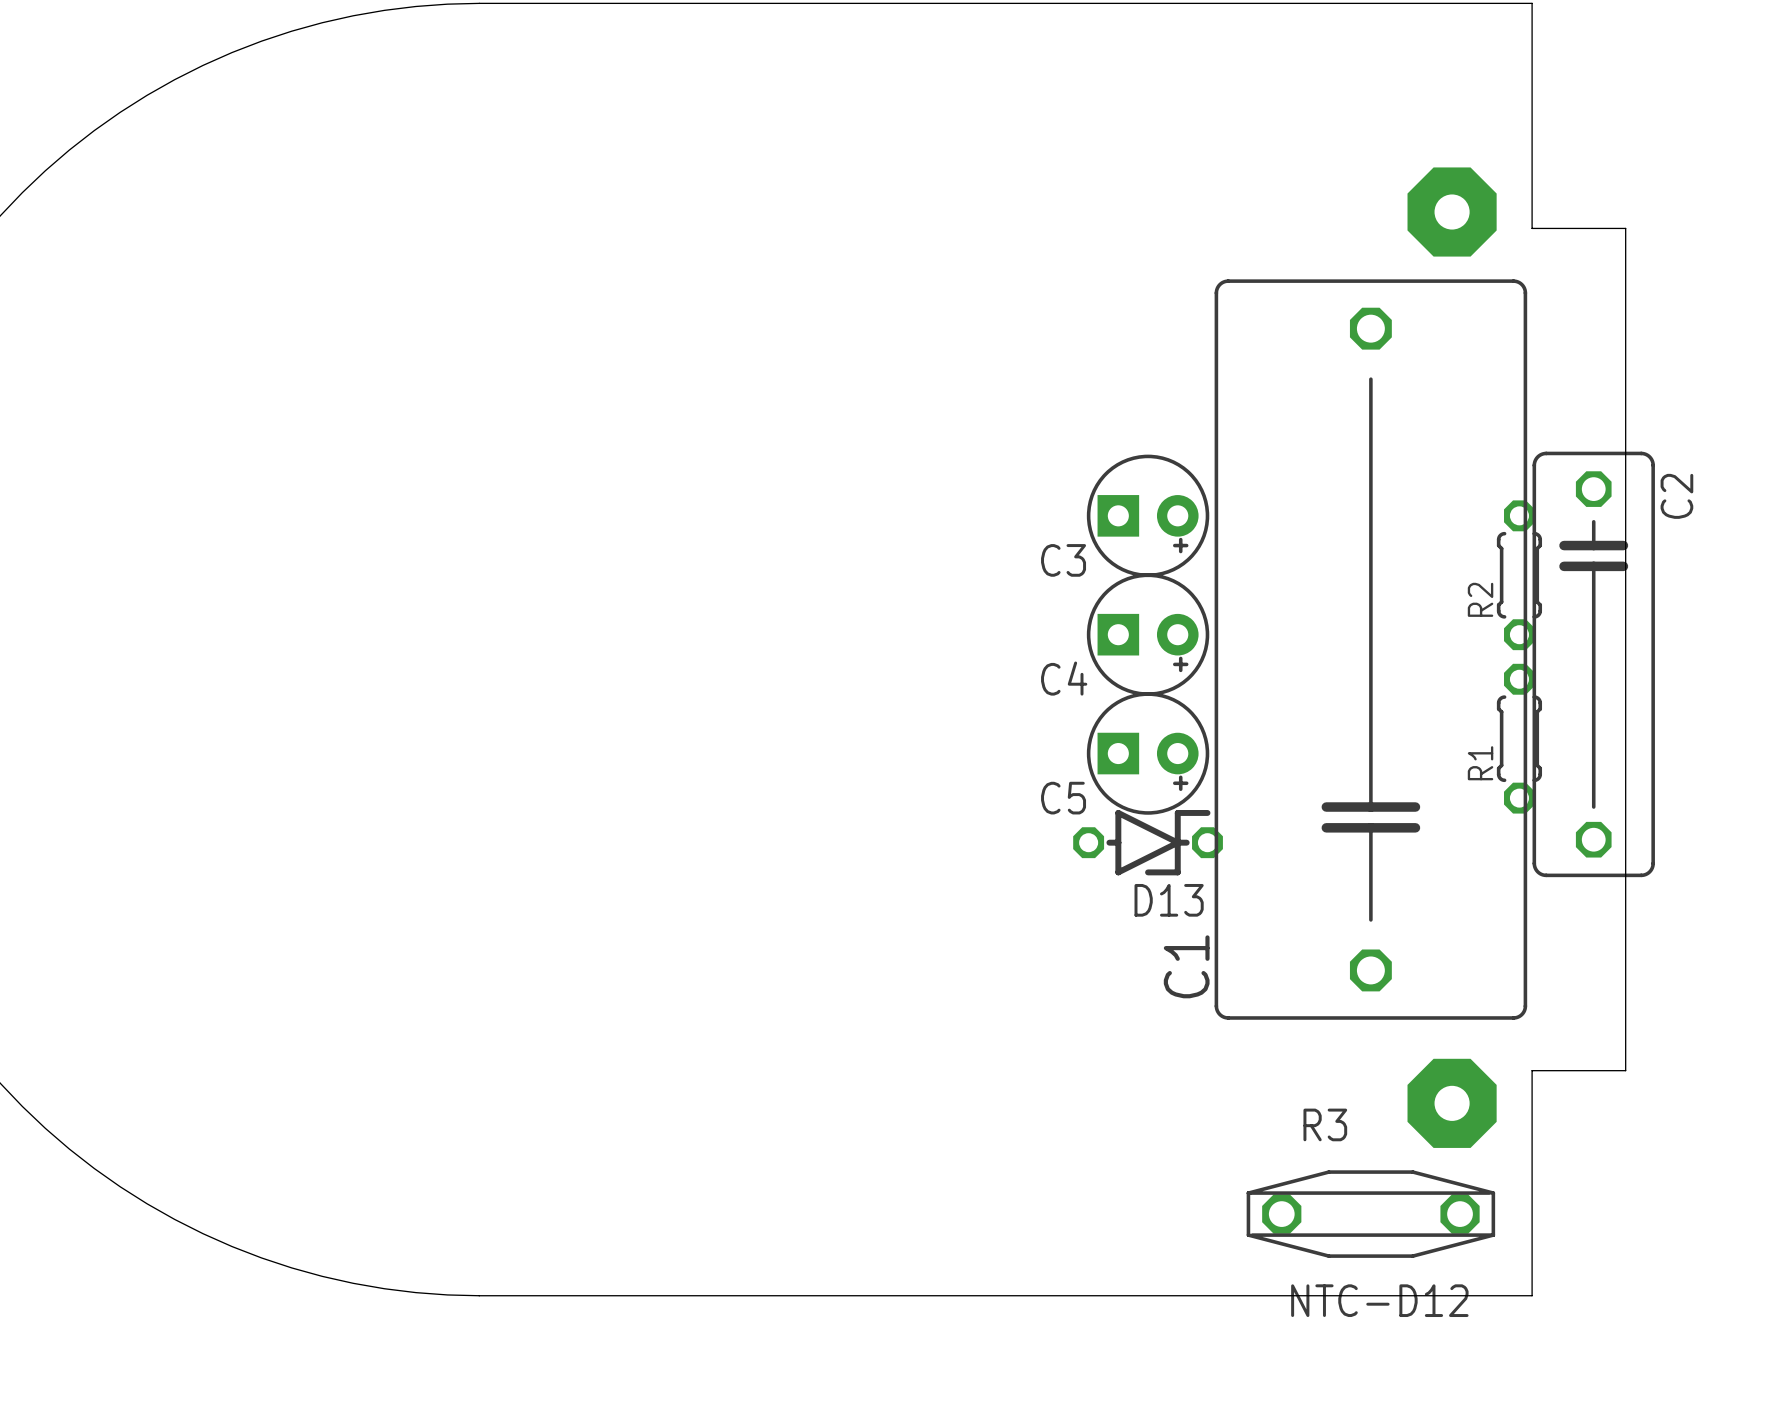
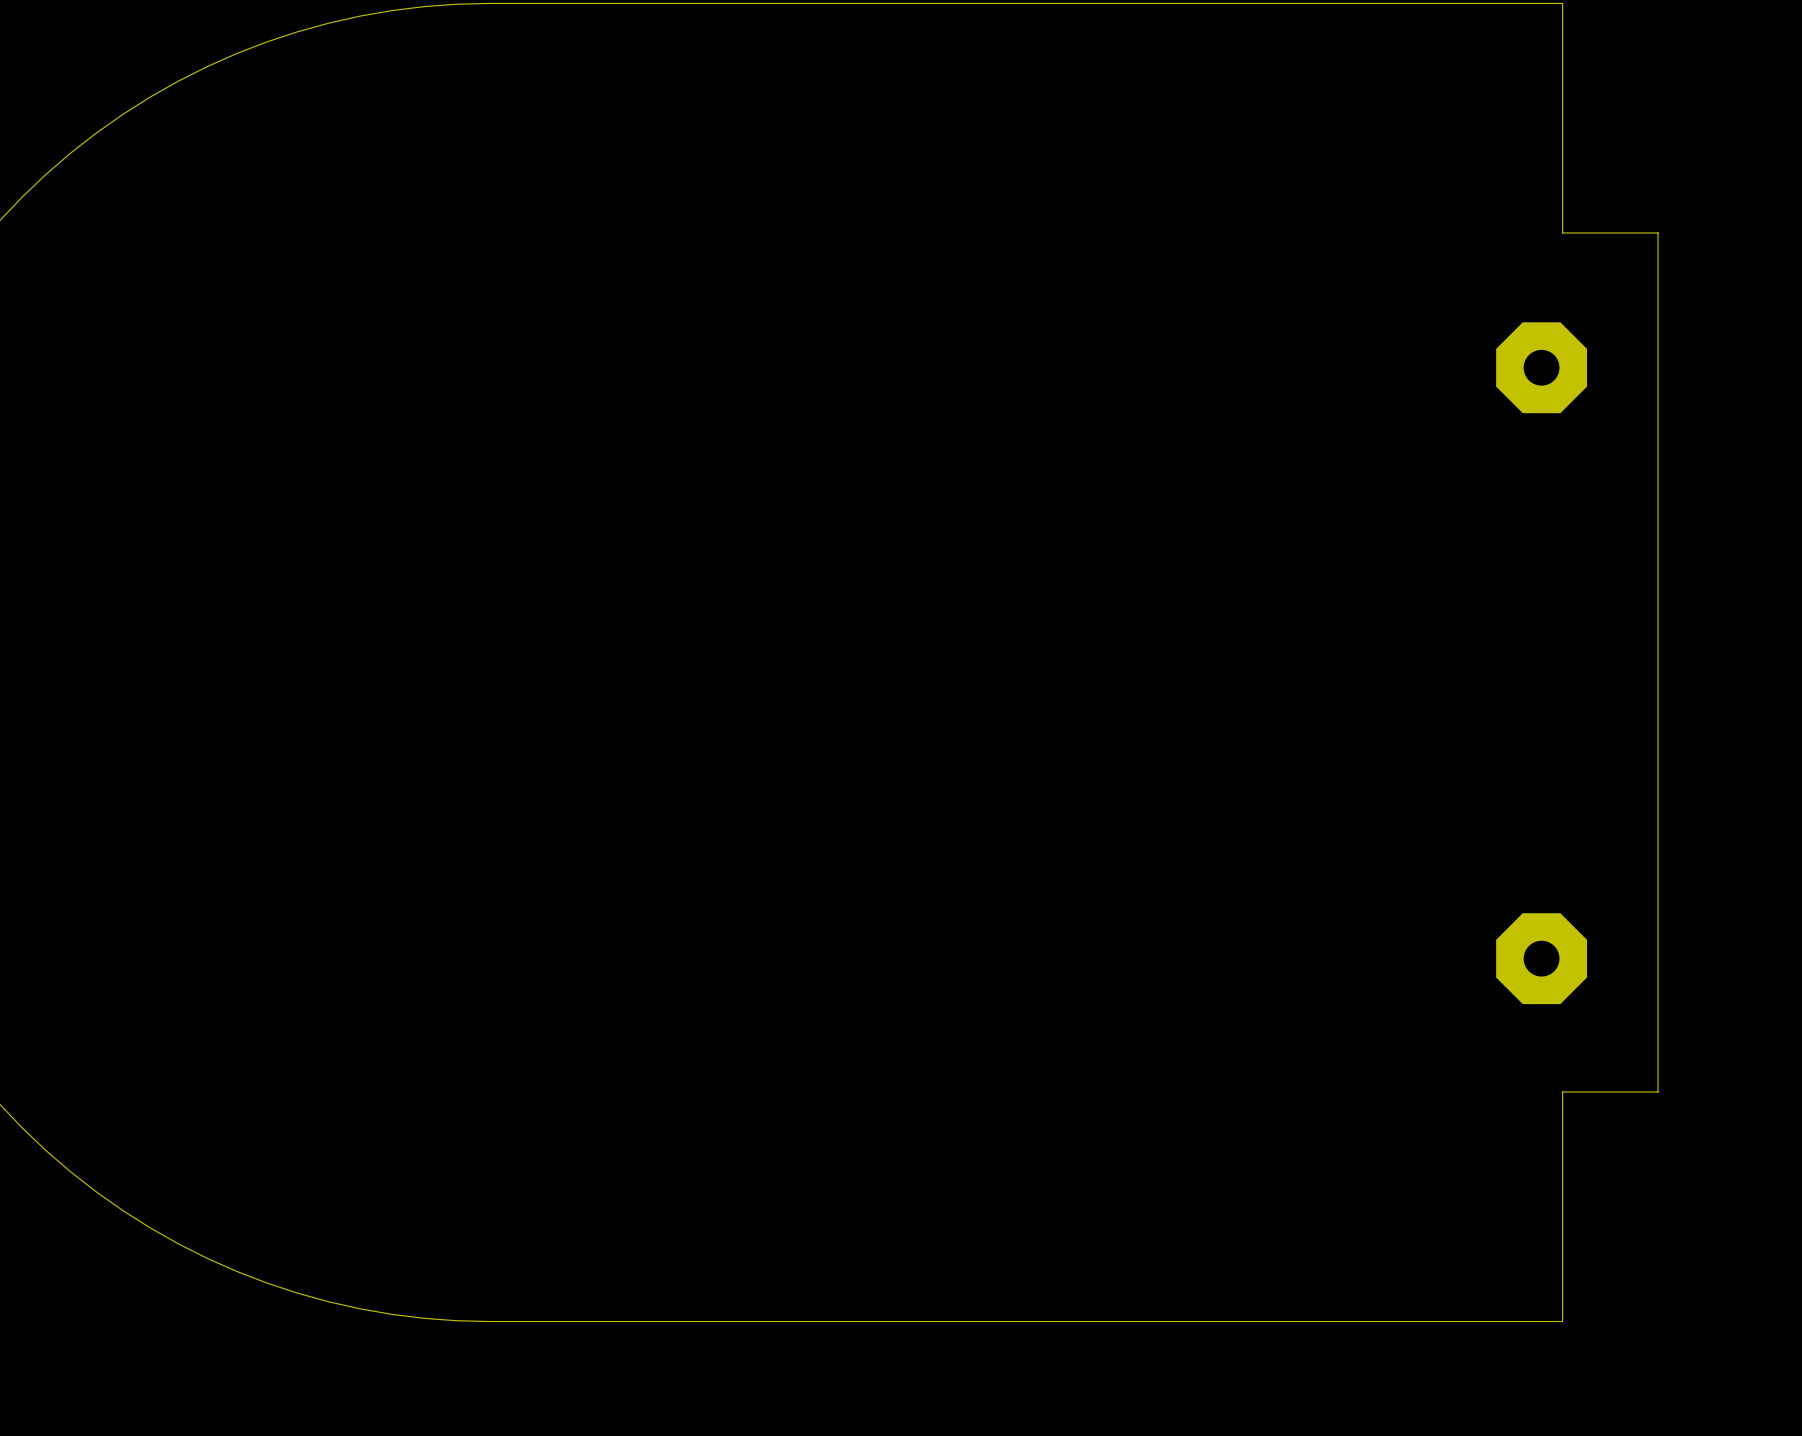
part position: (1452, 212) -> (1541, 367)
C3: (1148, 515) -> none
R2: (1519, 575) -> none
C4: (1148, 634) -> none
C1: (1370, 649) -> none
C2: (1593, 664) -> none
R1: (1519, 738) -> none
C5: (1148, 753) -> none
D13: (1148, 842) -> none
part position: (1452, 1103) -> (1541, 958)
R3: NTC-D12 (1370, 1214) -> none

